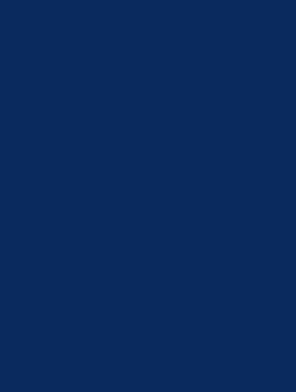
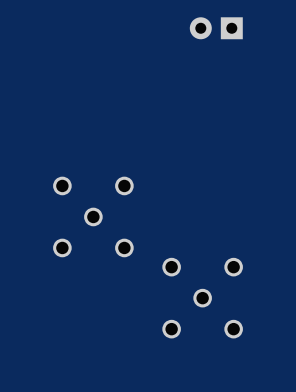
part: none -> (216, 28)
part: none -> (93, 216)
part: none -> (202, 298)

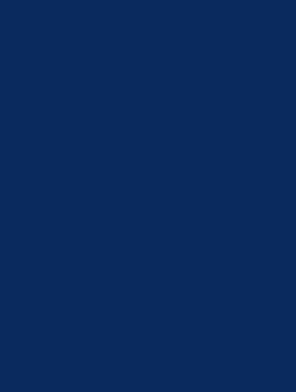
part: (216, 28) -> none
part: (93, 216) -> none
part: (202, 298) -> none

